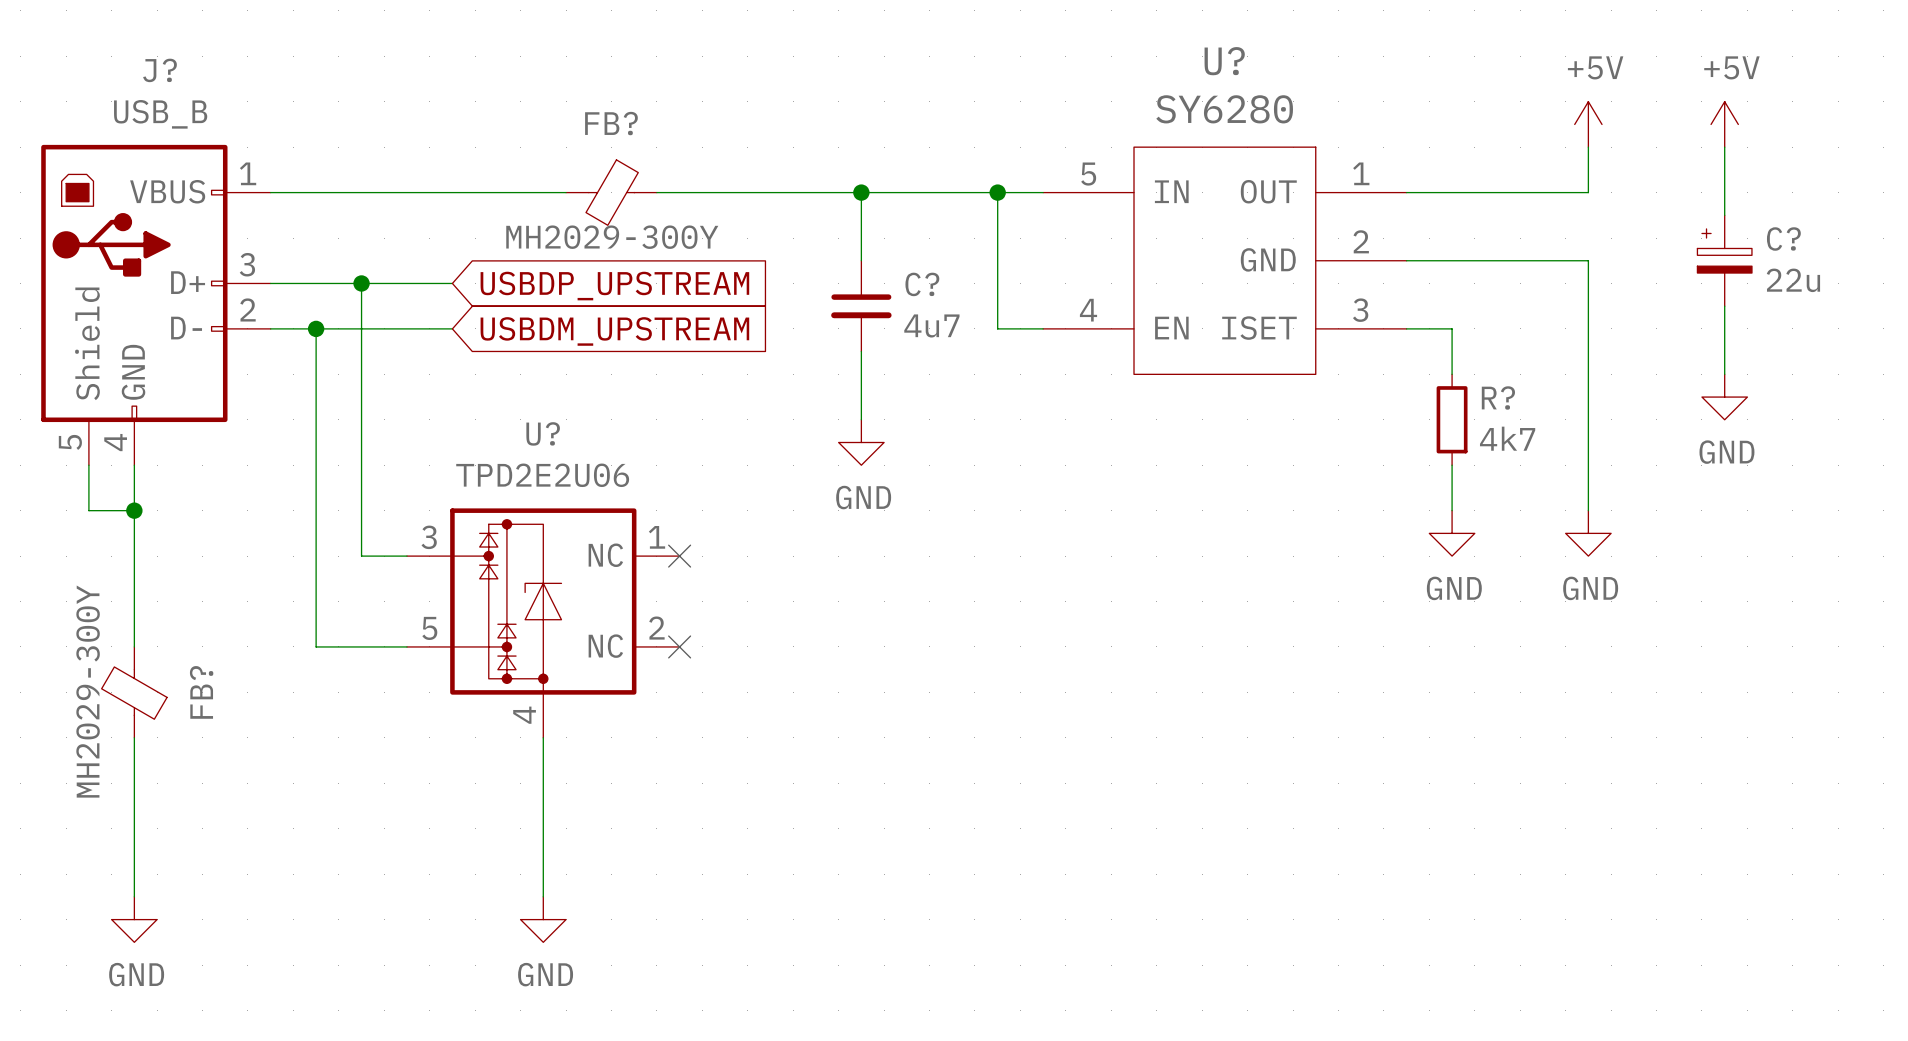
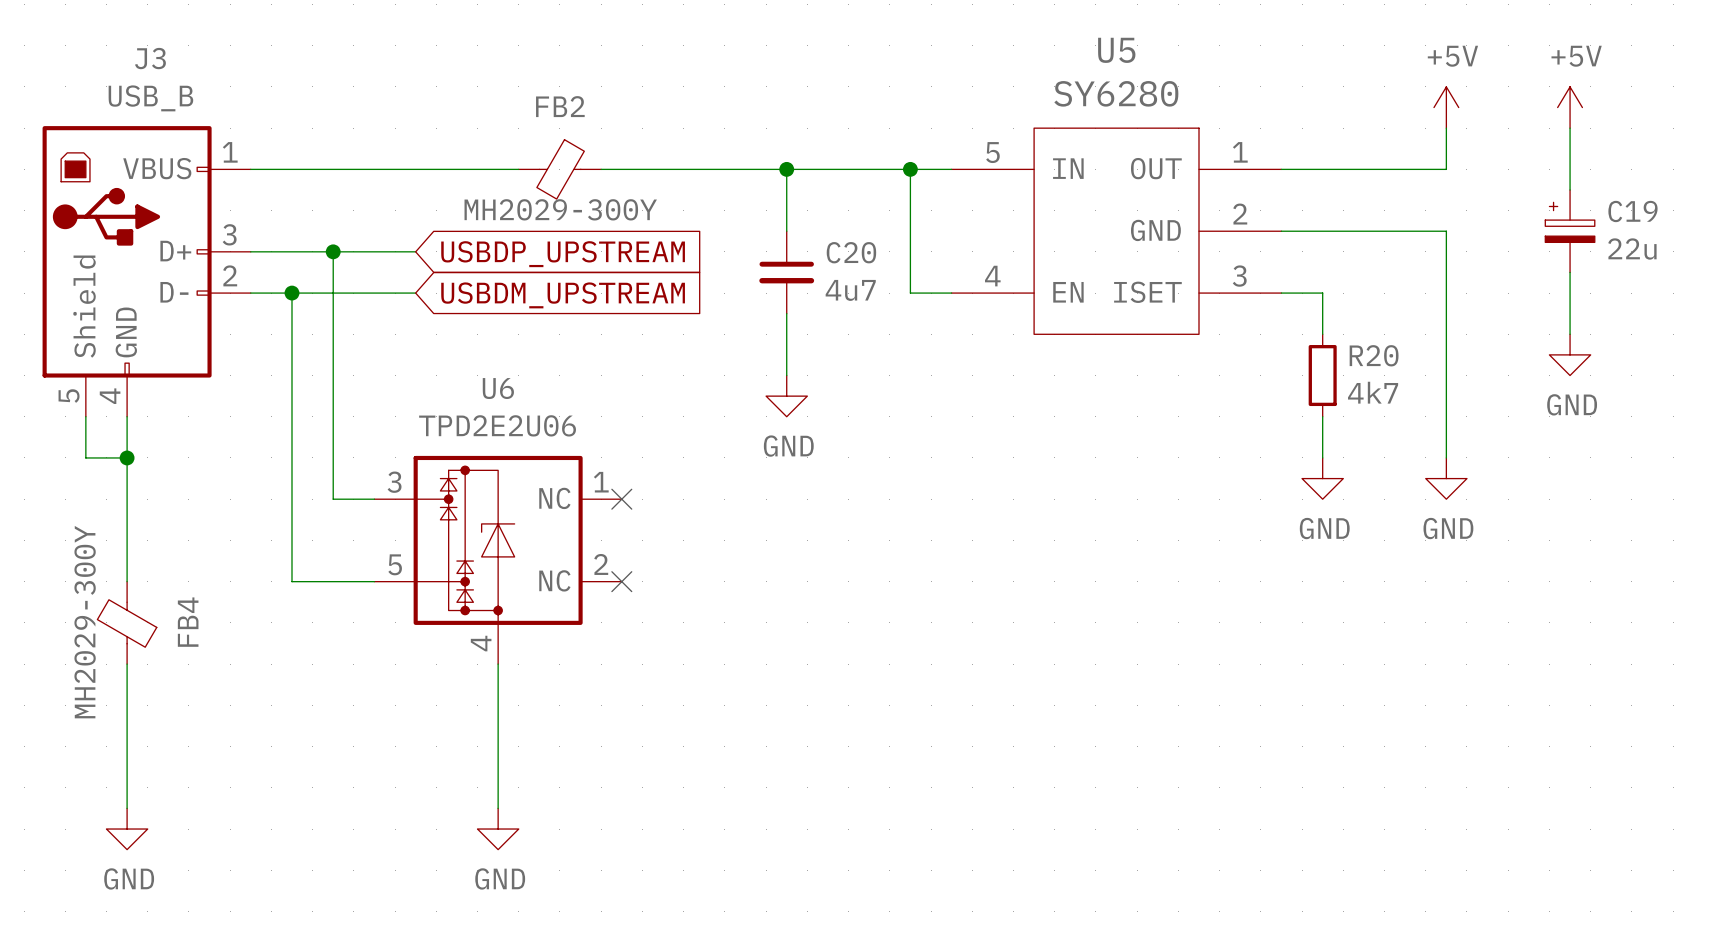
U? name: U? (1224, 61) -> U5 (1116, 50)
J? name: J? (160, 70) -> J3 (150, 58)
FB? name: FB? (611, 123) -> FB2 (560, 106)
C? name: C? (1783, 239) -> C19 (1632, 211)
C? name: C? (922, 284) -> C20 (851, 252)
R? name: R? (1498, 397) -> R20 (1374, 355)
U? name: U? (543, 433) -> U6 (498, 388)
FB? name: FB? (201, 692) -> FB4 (188, 622)

